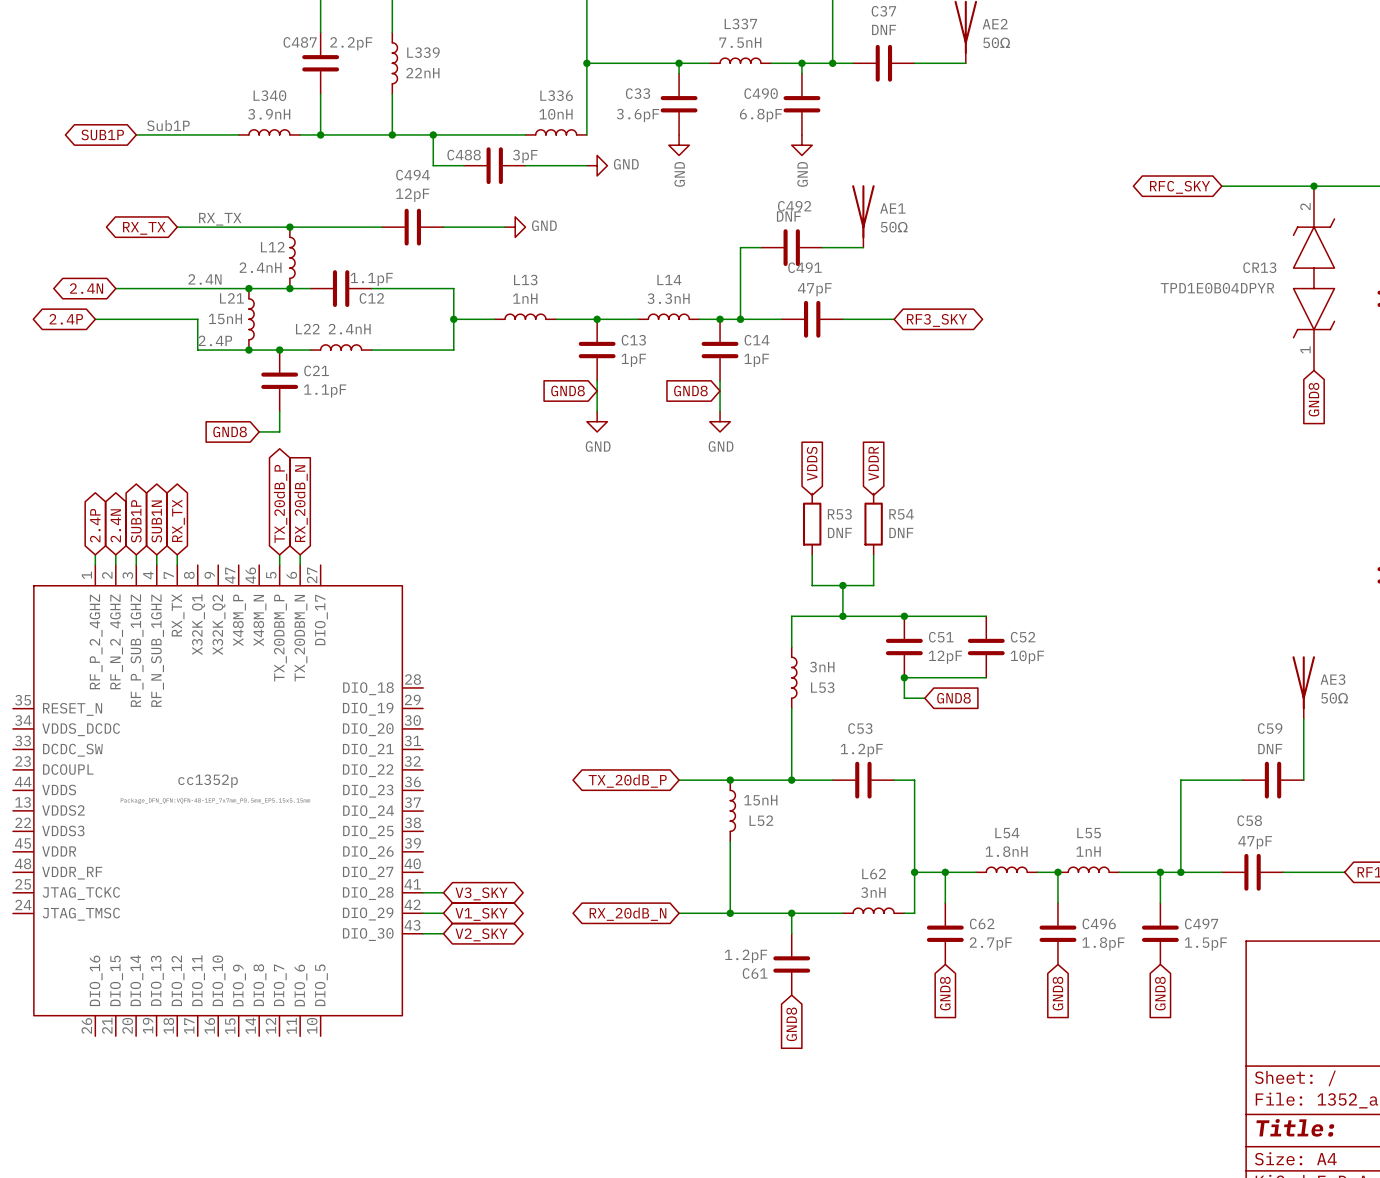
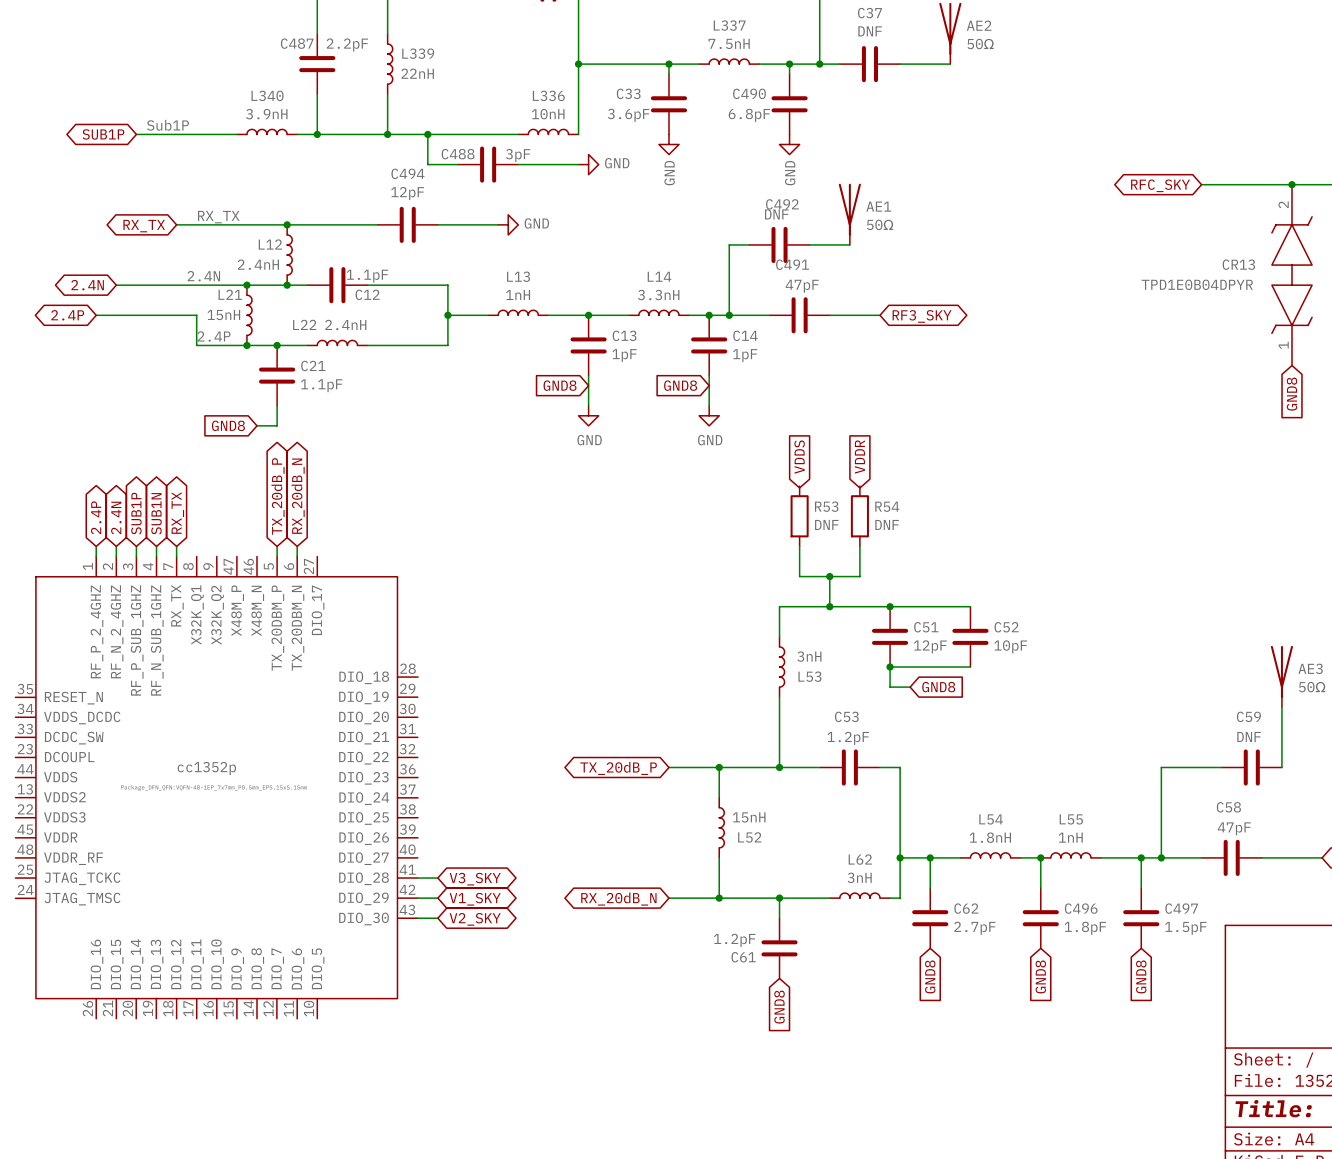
global label shape: input (301, 503) -> bidirectional (298, 496)
L52 position: (732, 810) -> (721, 827)
wire: (730, 841) (730, 872) -> (719, 767) (719, 797)

